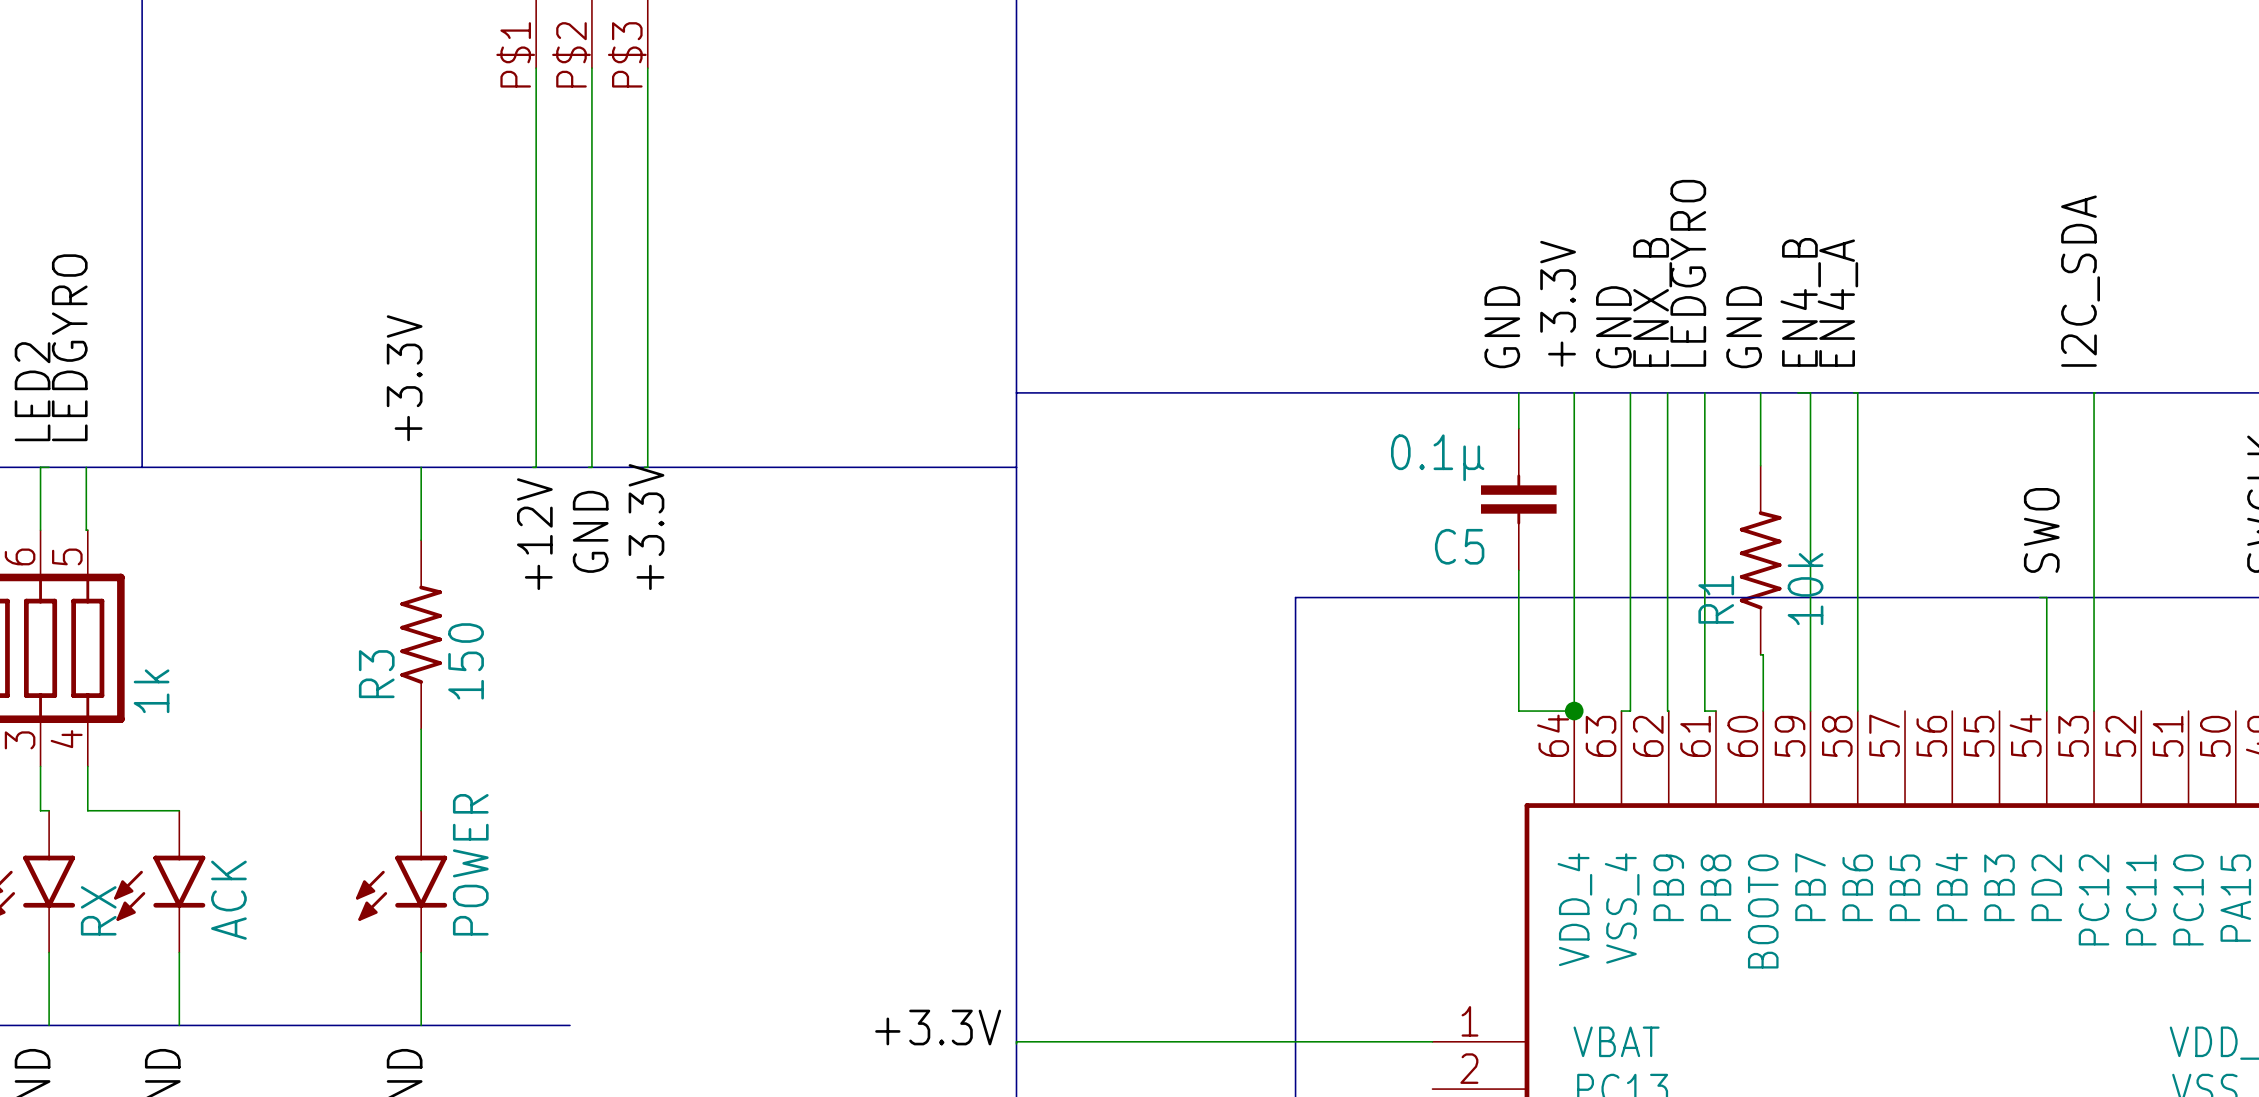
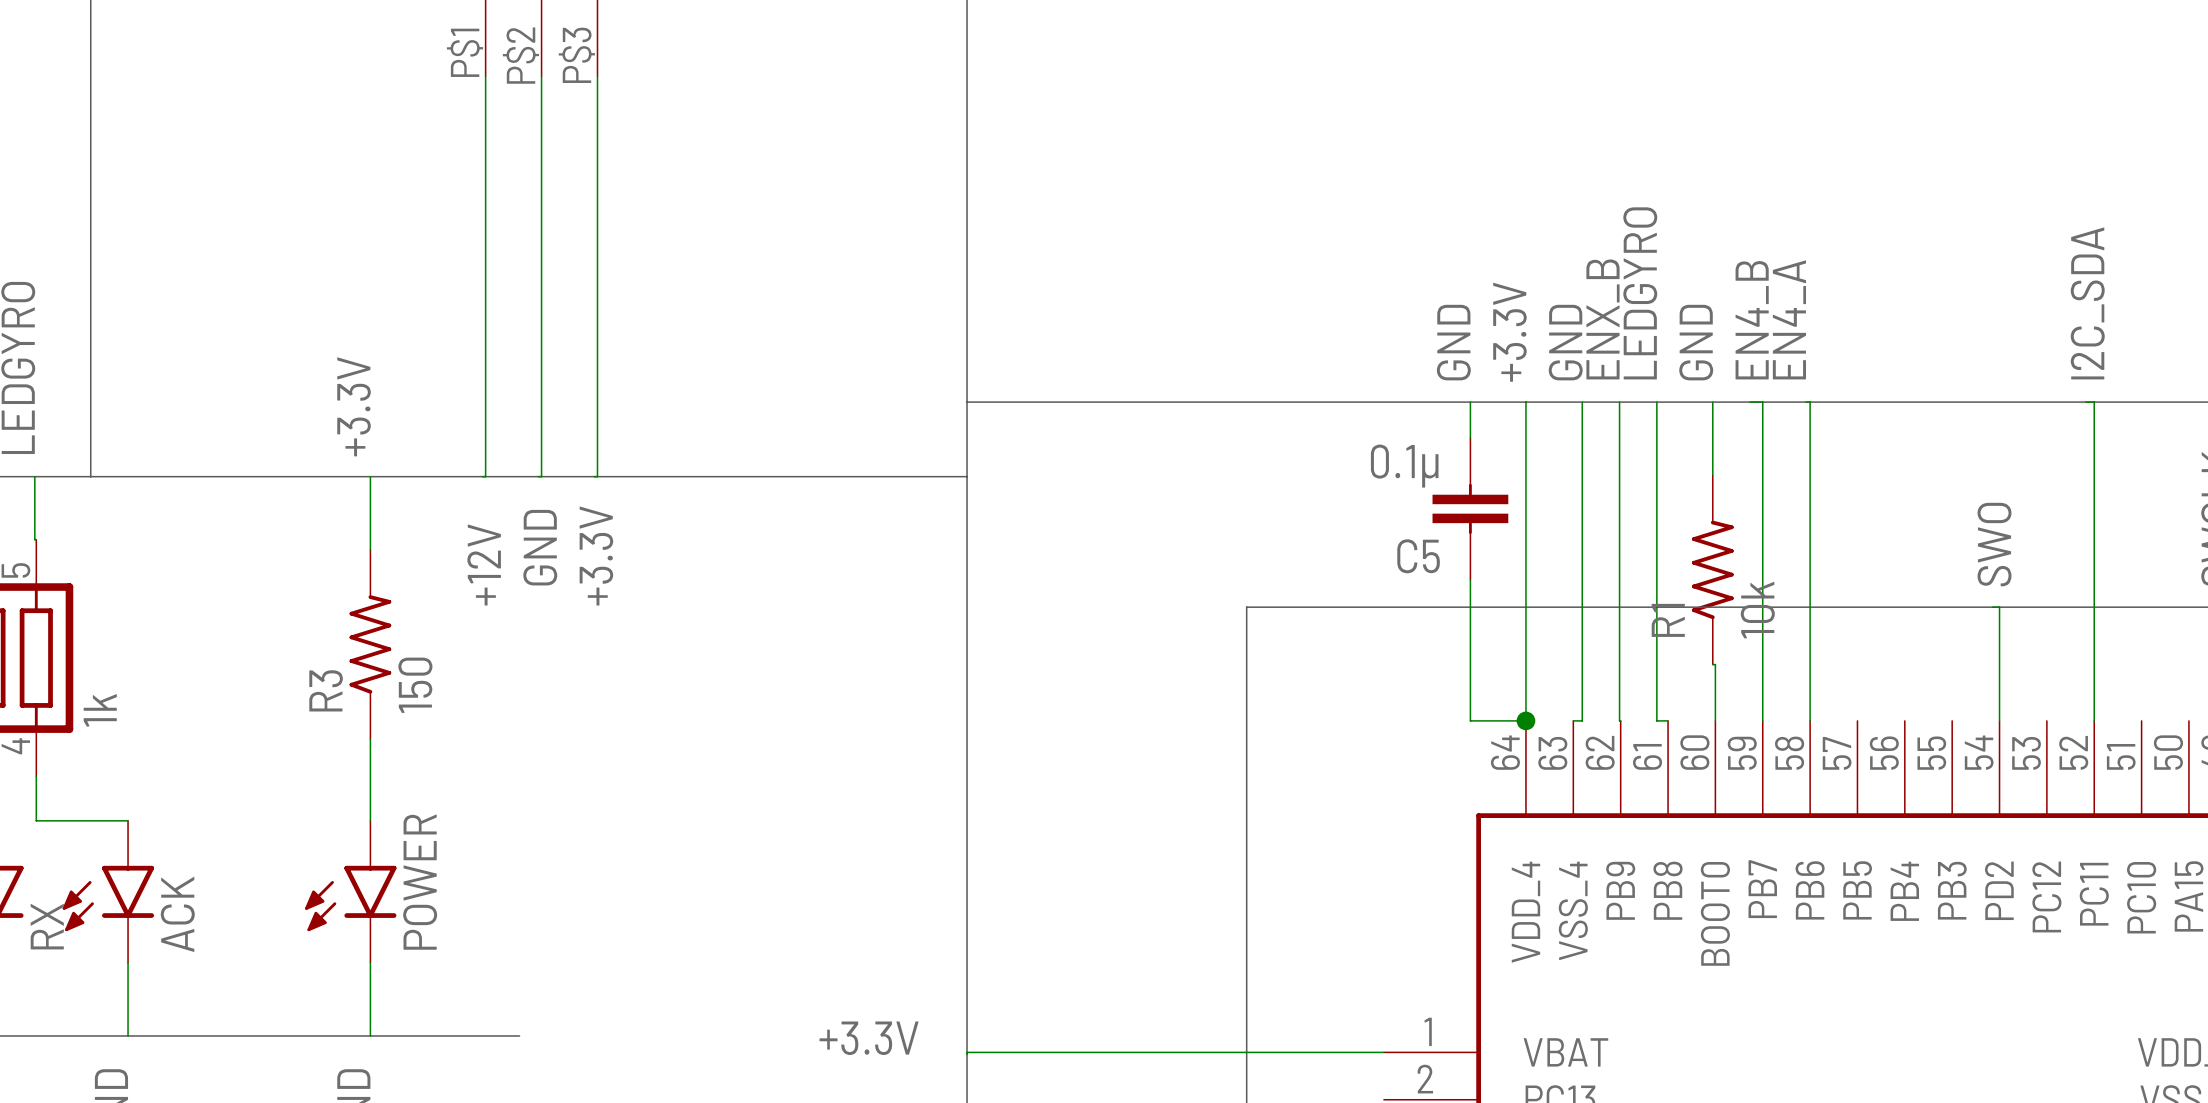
label position: I2C_SDA (2080, 281) -> I2C_SDA (2087, 303)
wire: (2095, 392) (2094, 711) -> none
wire: none -> (2085, 402) (2094, 402) (2094, 720)

